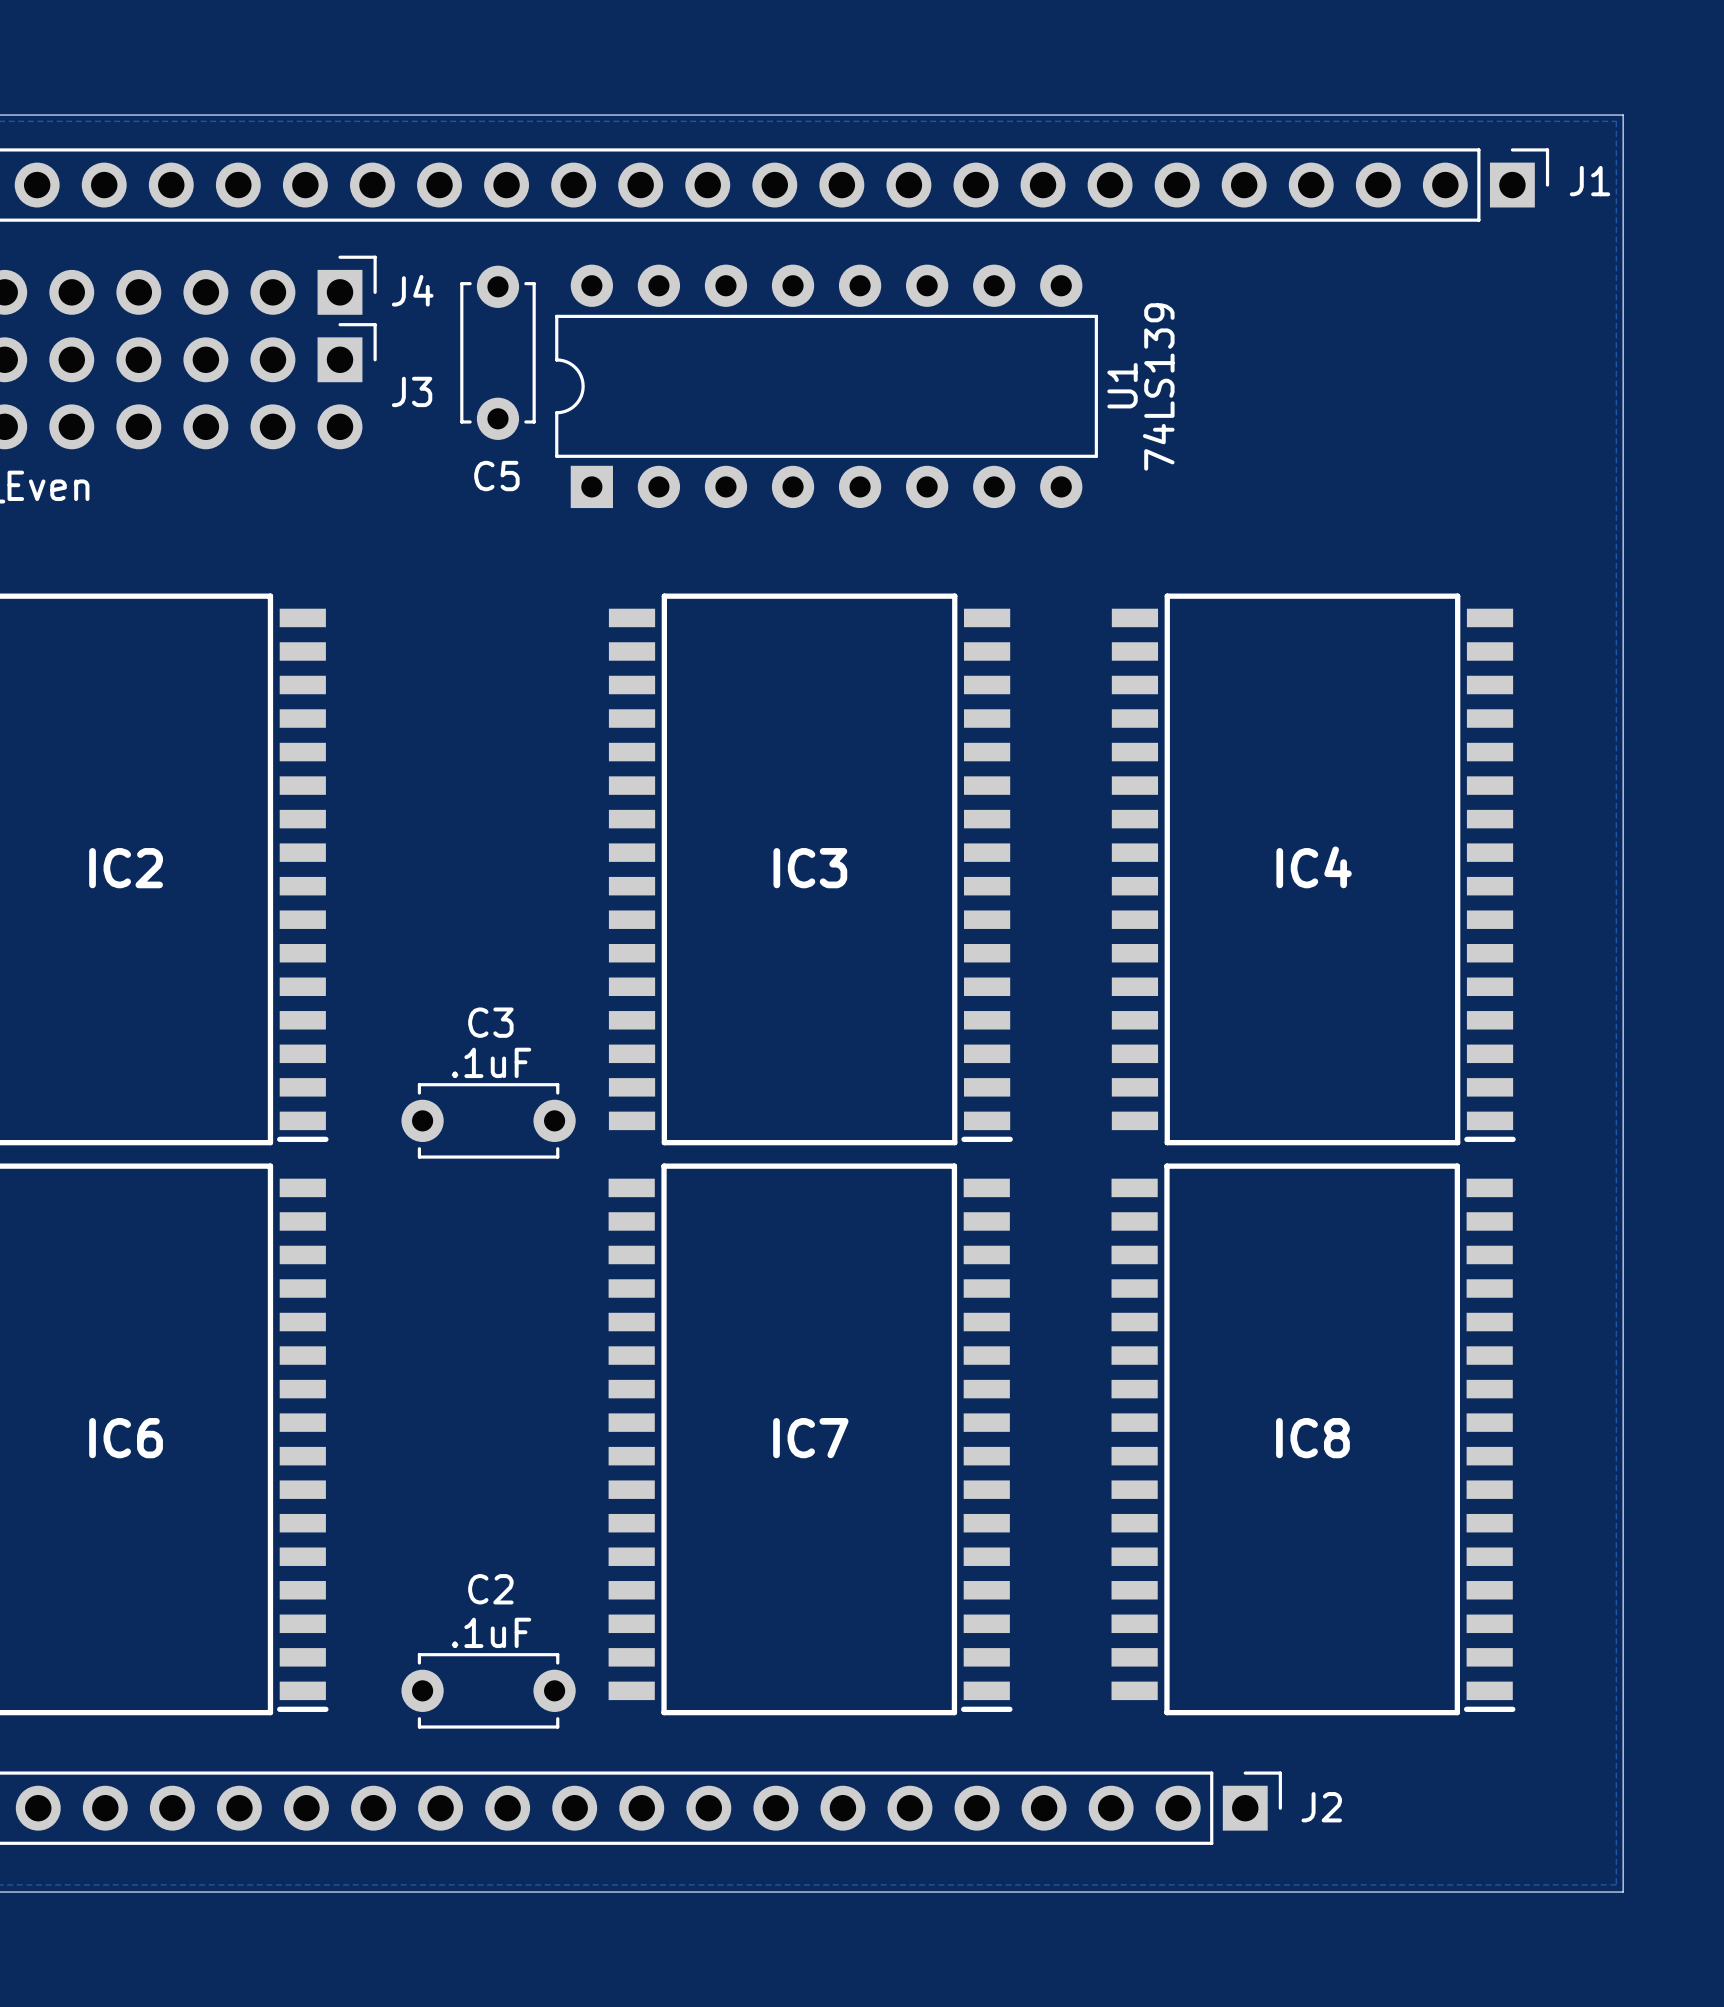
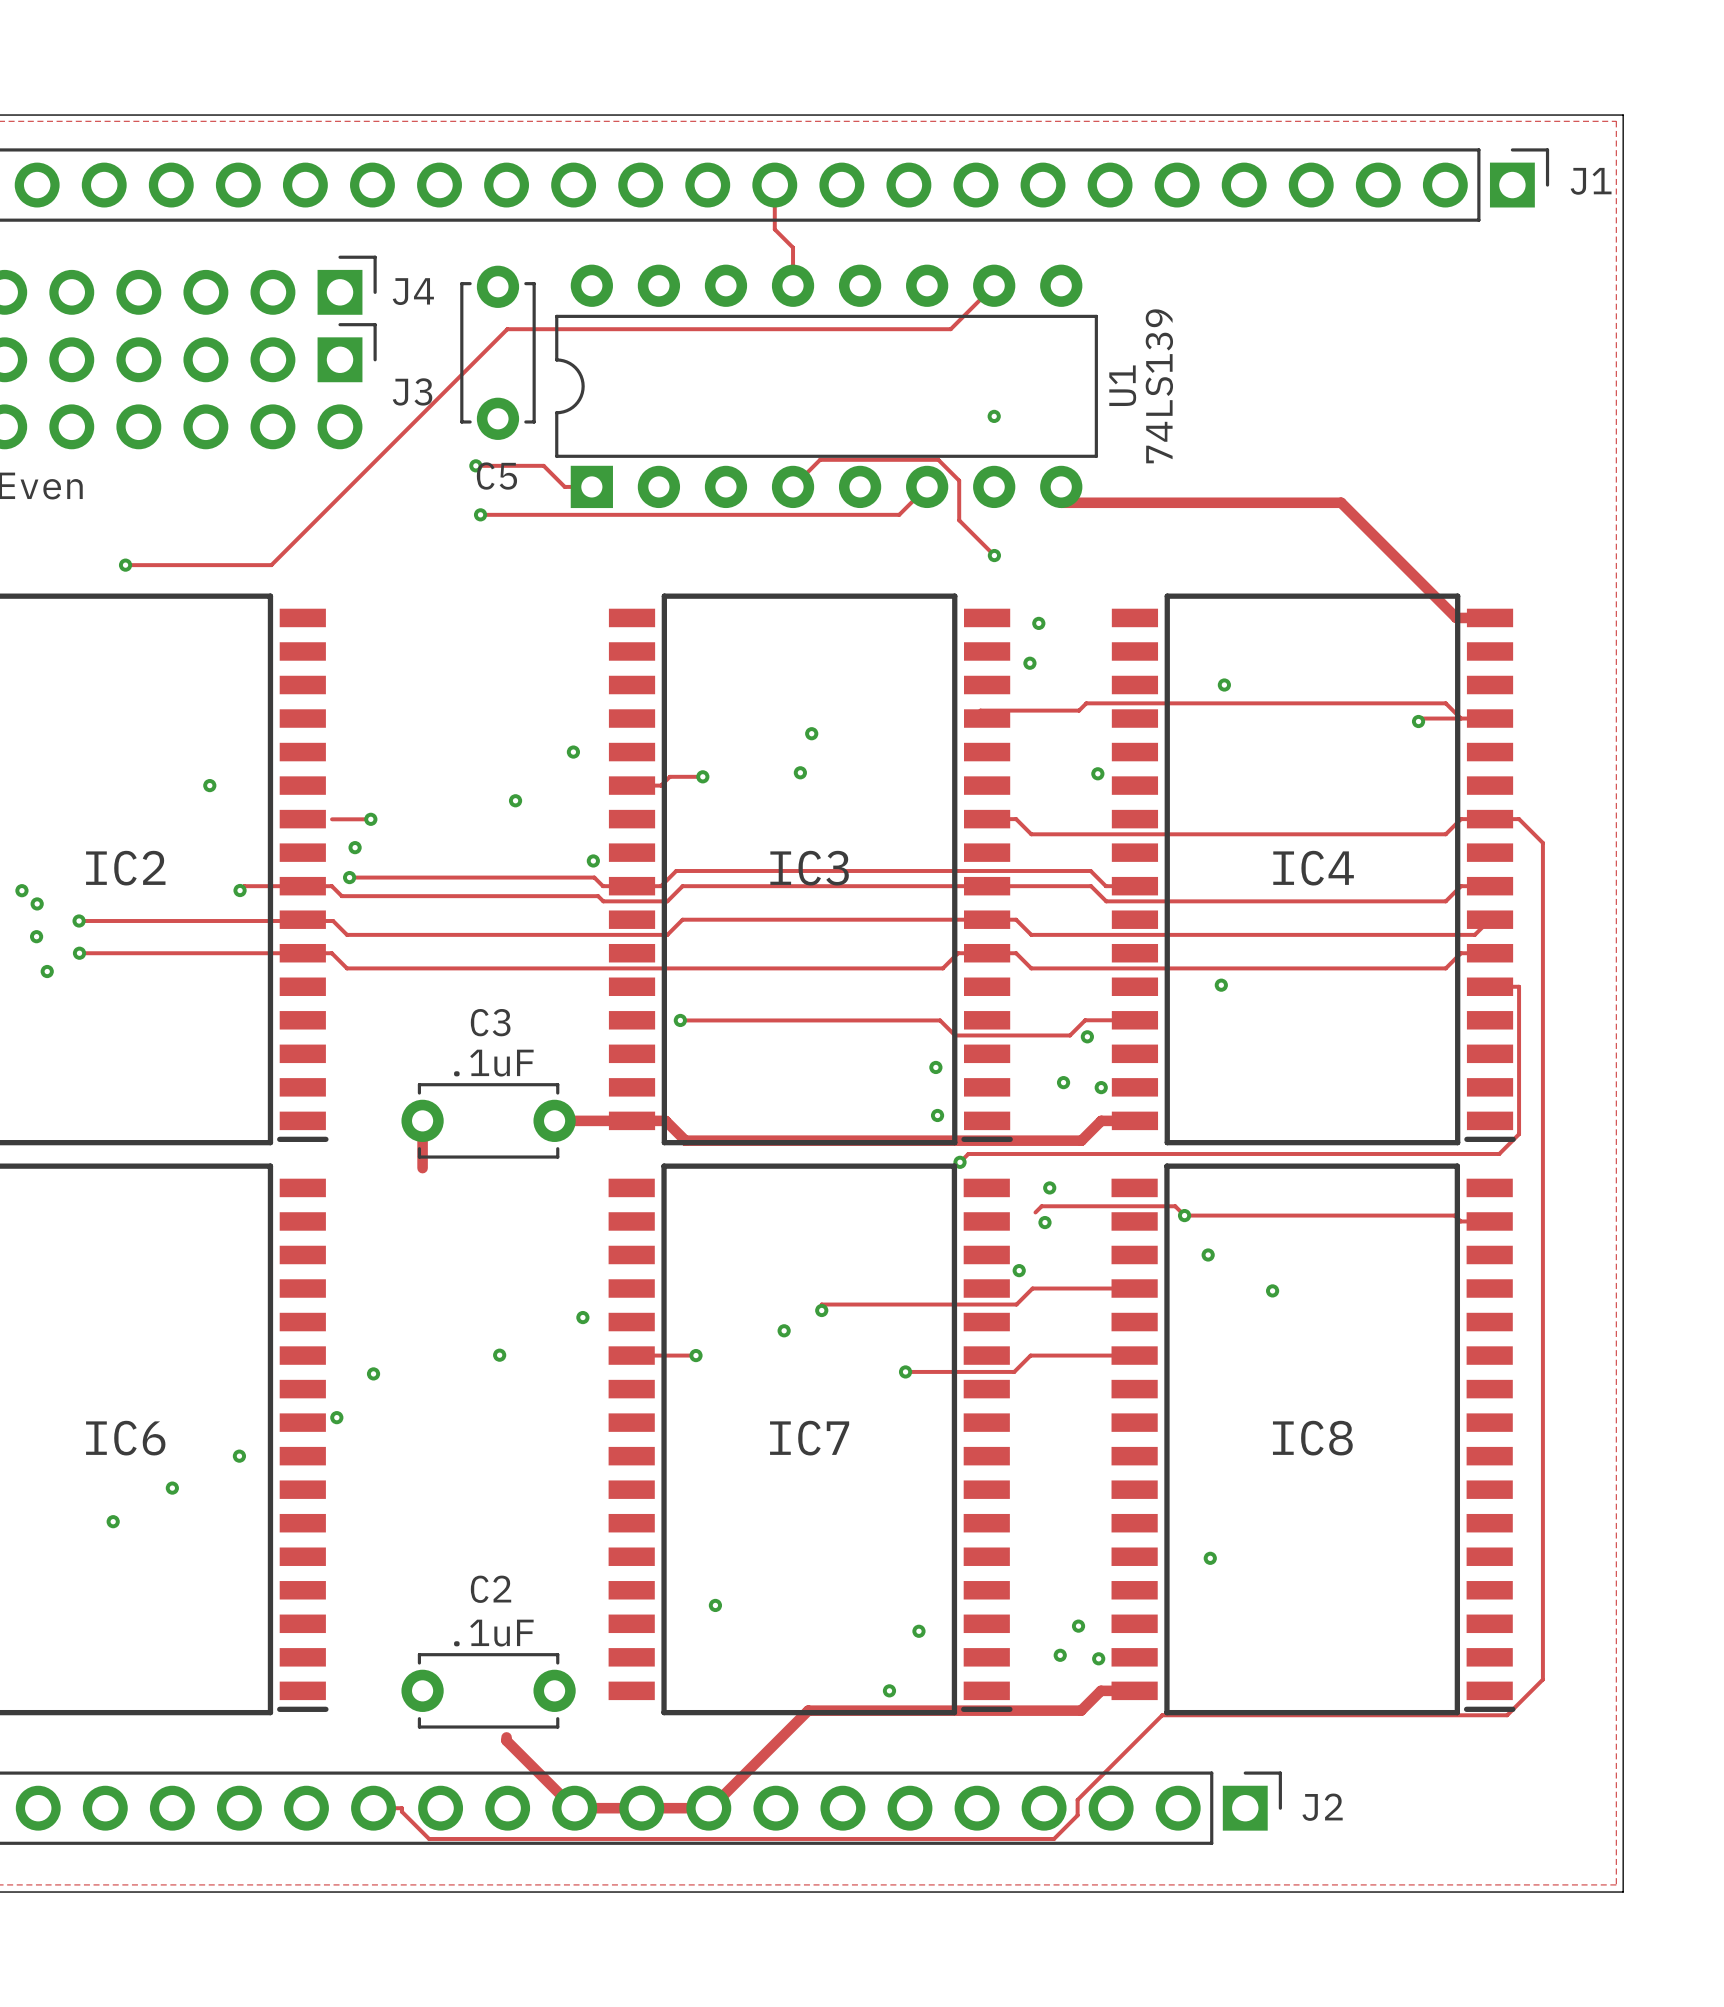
track: none -> (774, 185) (774, 229) (793, 247) (793, 285)
track: none -> (994, 285) (950, 329) (507, 329) (271, 565) (125, 565)
via: none -> (994, 416)
track: none -> (475, 465) (543, 465) (564, 486) (591, 486)
via: none -> (475, 465)
track: none -> (793, 486) (820, 459) (938, 459) (959, 480) (959, 520) (994, 555)
track: none -> (927, 486) (899, 514) (480, 514)
track: none -> (1061, 502) (1341, 502) (1456, 617) (1490, 617)
via: none -> (480, 514)
via: none -> (994, 555)
via: none -> (125, 565)
via: none -> (1038, 623)
via: none -> (1029, 663)
via: none -> (1224, 685)
track: none -> (972, 718) (980, 710) (1079, 710) (1086, 703) (1445, 703) (1460, 718)
track: none -> (1490, 718) (1421, 718) (1418, 721)
via: none -> (1418, 721)
via: none -> (811, 733)
via: none -> (573, 752)
via: none -> (800, 772)
via: none -> (1097, 773)
track: none -> (702, 776) (669, 776) (661, 785) (632, 785)
via: none -> (702, 776)
via: none -> (209, 785)
via: none -> (515, 800)
track: none -> (332, 819) (370, 819)
via: none -> (370, 819)
track: none -> (987, 819) (1016, 819) (1031, 834) (1445, 834) (1460, 819) (1519, 819) (1542, 842) (1542, 1679) (1507, 1715) (1162, 1715) (1077, 1799) (1077, 1815) (1053, 1838) (429, 1838) (401, 1811) (401, 1808) (373, 1808)
via: none -> (355, 847)
via: none -> (593, 860)
track: none -> (349, 877) (594, 877) (602, 886) (661, 886) (676, 870) (1090, 870) (1105, 886) (1134, 886)
via: none -> (349, 877)
track: none -> (1490, 886) (1460, 886) (1445, 901) (1106, 901) (1091, 886) (682, 886) (667, 901) (603, 901) (598, 896) (341, 896) (331, 886) (244, 886) (240, 890)
via: none -> (21, 890)
via: none -> (240, 890)
via: none -> (37, 903)
track: none -> (1490, 919) (1474, 934) (1031, 934) (1016, 919) (682, 919) (667, 934) (347, 934) (333, 920) (79, 920)
via: none -> (79, 920)
via: none -> (36, 936)
track: none -> (79, 953) (331, 953) (347, 968) (942, 968) (958, 953) (1016, 953) (1031, 968) (1445, 968) (1460, 953) (1490, 953)
via: none -> (79, 953)
via: none -> (47, 971)
via: none -> (1221, 985)
track: none -> (1490, 986) (1519, 986) (1519, 1134) (1499, 1153) (968, 1153) (960, 1162)
via: none -> (680, 1020)
track: none -> (1134, 1020) (1085, 1020) (1070, 1035) (955, 1035) (940, 1020) (680, 1020)
via: none -> (1087, 1036)
via: none -> (935, 1067)
via: none -> (1063, 1082)
via: none -> (1101, 1087)
via: none -> (937, 1115)
track: none -> (422, 1120) (422, 1168)
track: none -> (554, 1120) (665, 1120) (685, 1140) (1081, 1140) (1101, 1120) (1134, 1120)
via: none -> (960, 1162)
via: none -> (1049, 1187)
track: none -> (1035, 1212) (1041, 1206) (1175, 1206) (1184, 1215) (1454, 1215) (1460, 1221) (1489, 1221)
via: none -> (1184, 1215)
via: none -> (1044, 1222)
via: none -> (1208, 1254)
via: none -> (1019, 1270)
track: none -> (1134, 1288) (1032, 1288) (1016, 1304) (821, 1304) (821, 1310)
via: none -> (1272, 1290)
via: none -> (821, 1310)
via: none -> (582, 1317)
via: none -> (784, 1330)
via: none -> (499, 1355)
track: none -> (631, 1355) (695, 1355)
via: none -> (695, 1355)
track: none -> (1134, 1355) (1030, 1355) (1014, 1371) (905, 1371)
via: none -> (905, 1371)
via: none -> (373, 1373)
via: none -> (336, 1417)
via: none -> (239, 1456)
via: none -> (172, 1488)
via: none -> (113, 1521)
via: none -> (1210, 1558)
via: none -> (715, 1605)
via: none -> (1078, 1626)
via: none -> (918, 1631)
via: none -> (1060, 1655)
via: none -> (1098, 1658)
via: none -> (889, 1690)
track: none -> (1134, 1690) (1100, 1690) (1081, 1710) (808, 1710) (710, 1808) (574, 1808) (506, 1740) (506, 1737)

